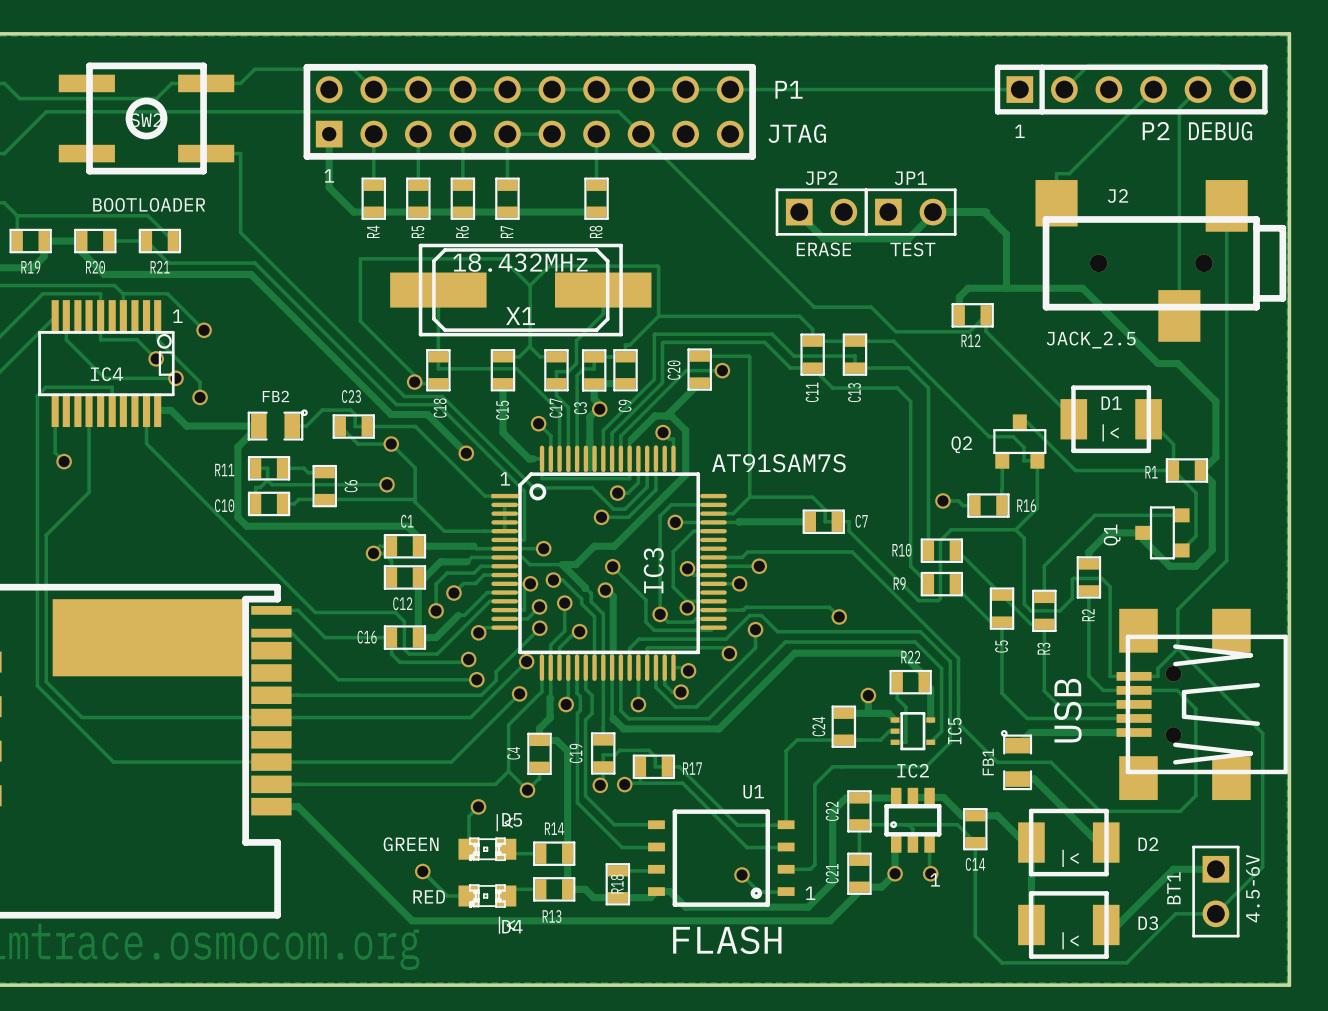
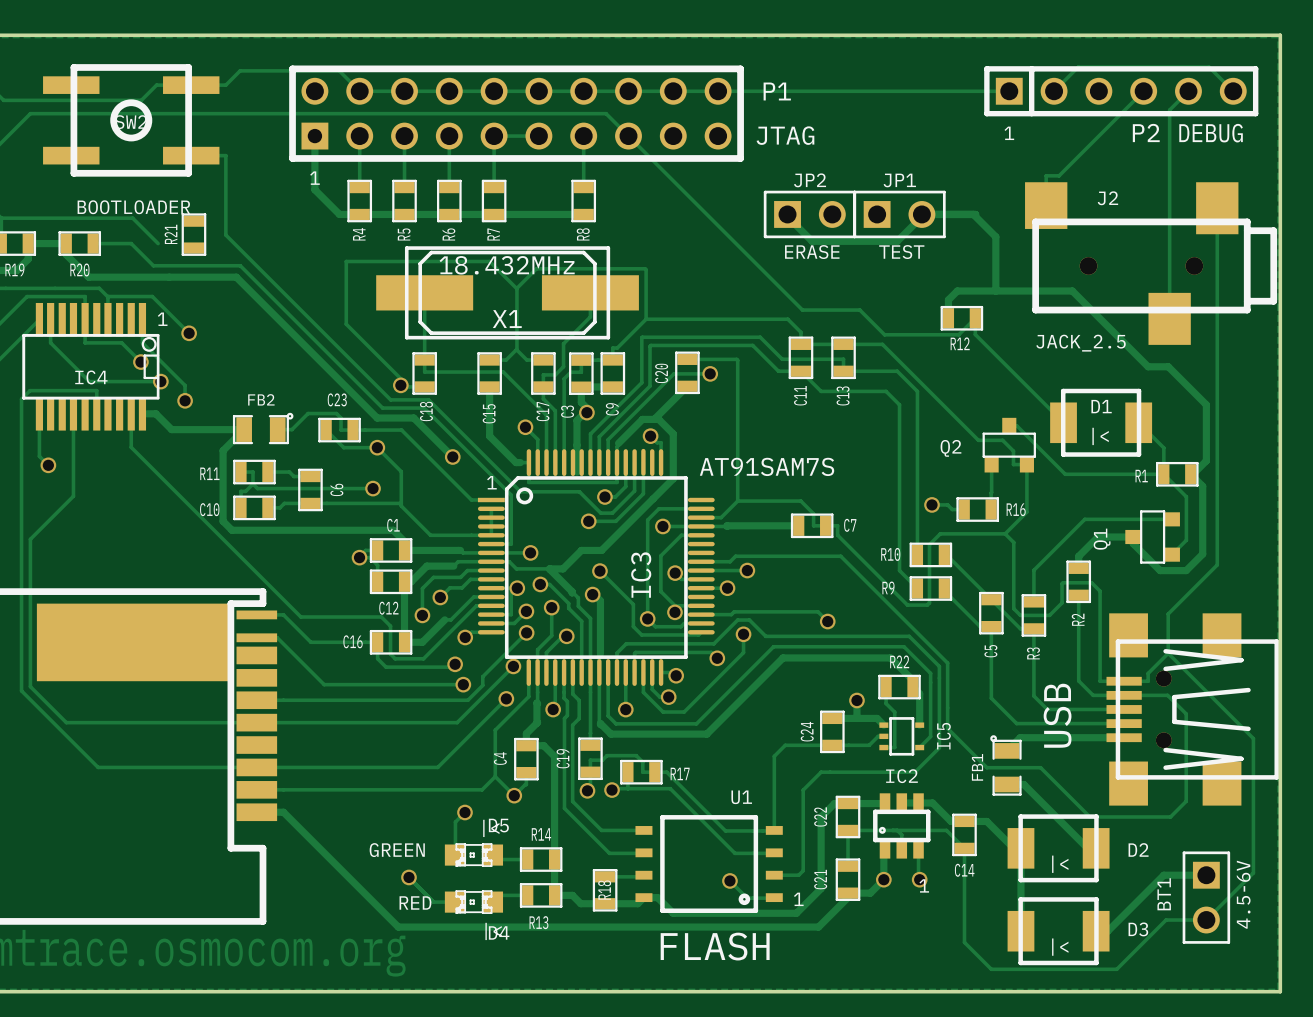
R21 rotation: 0° (159, 241) -> 90° clockwise (193, 234)
R21 position: (159, 241) -> (193, 234)

